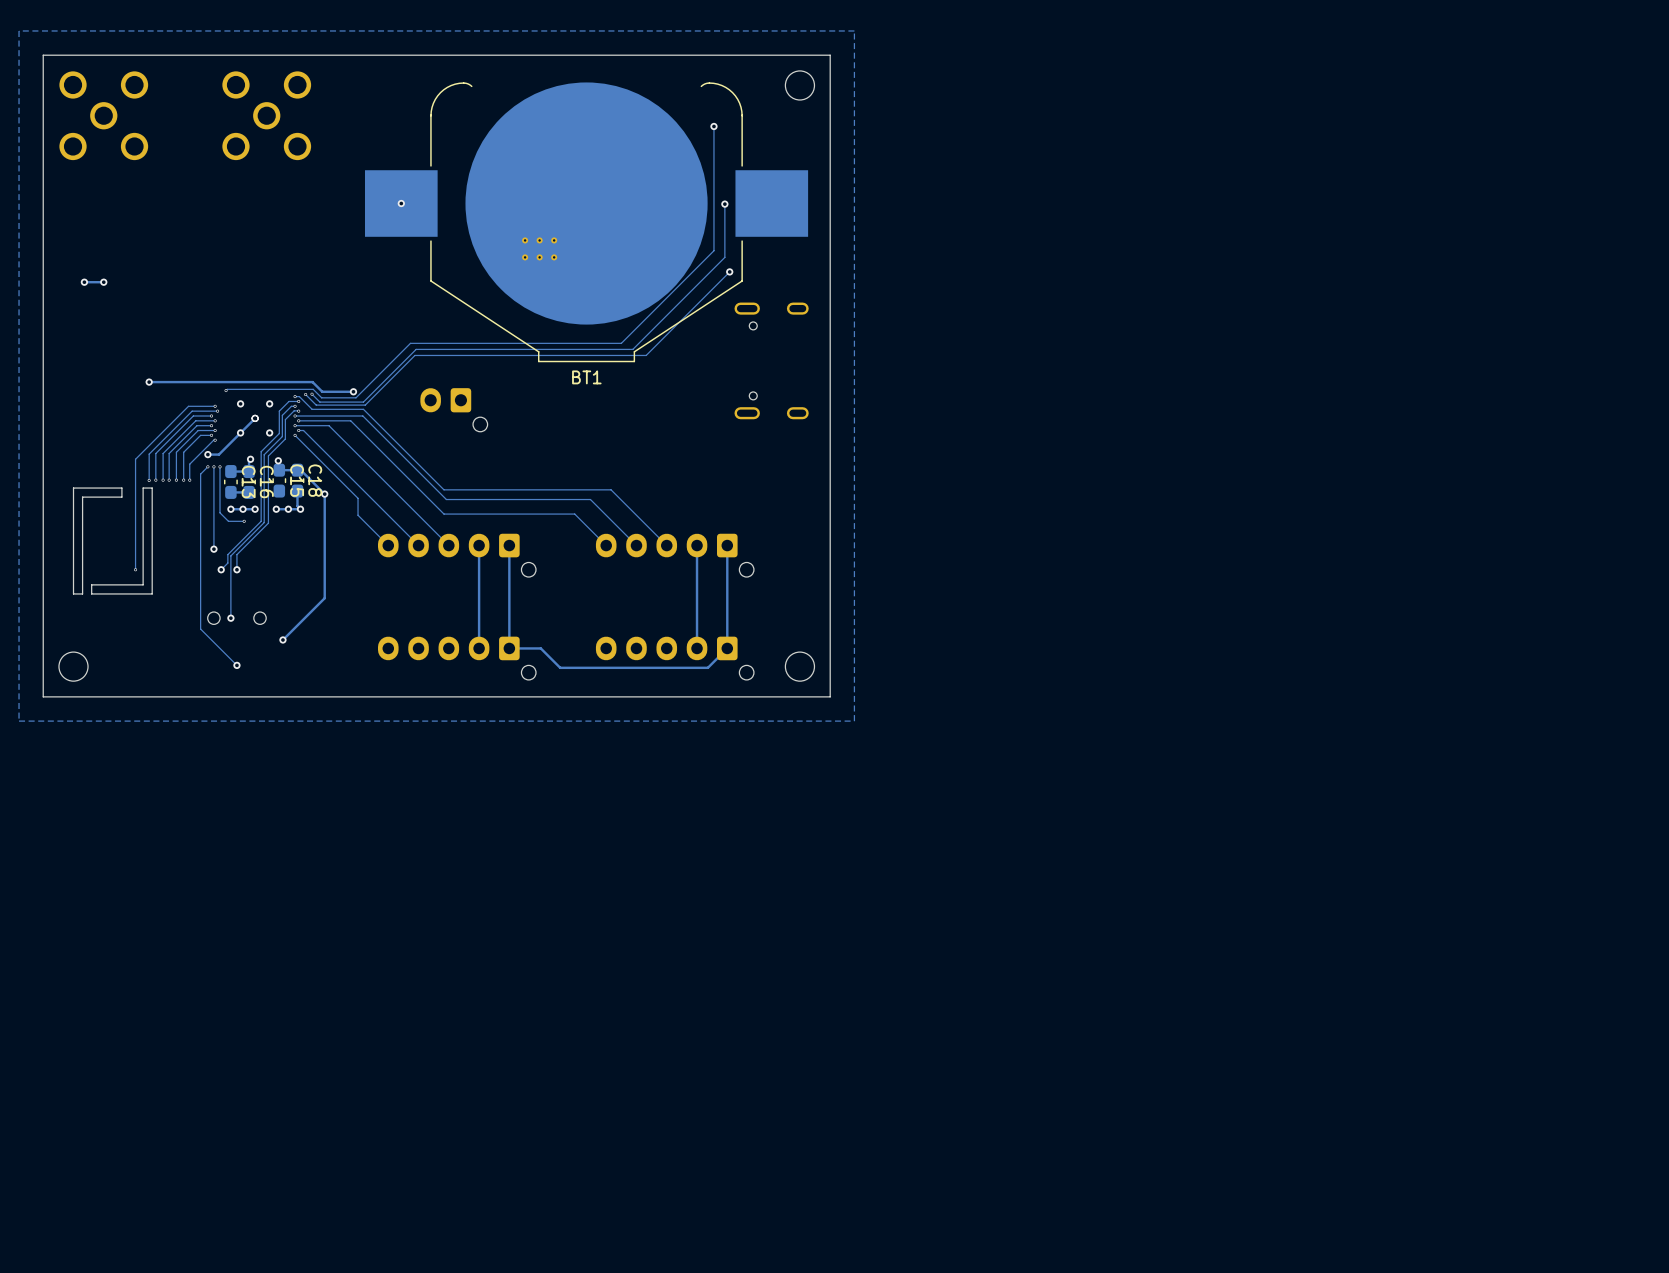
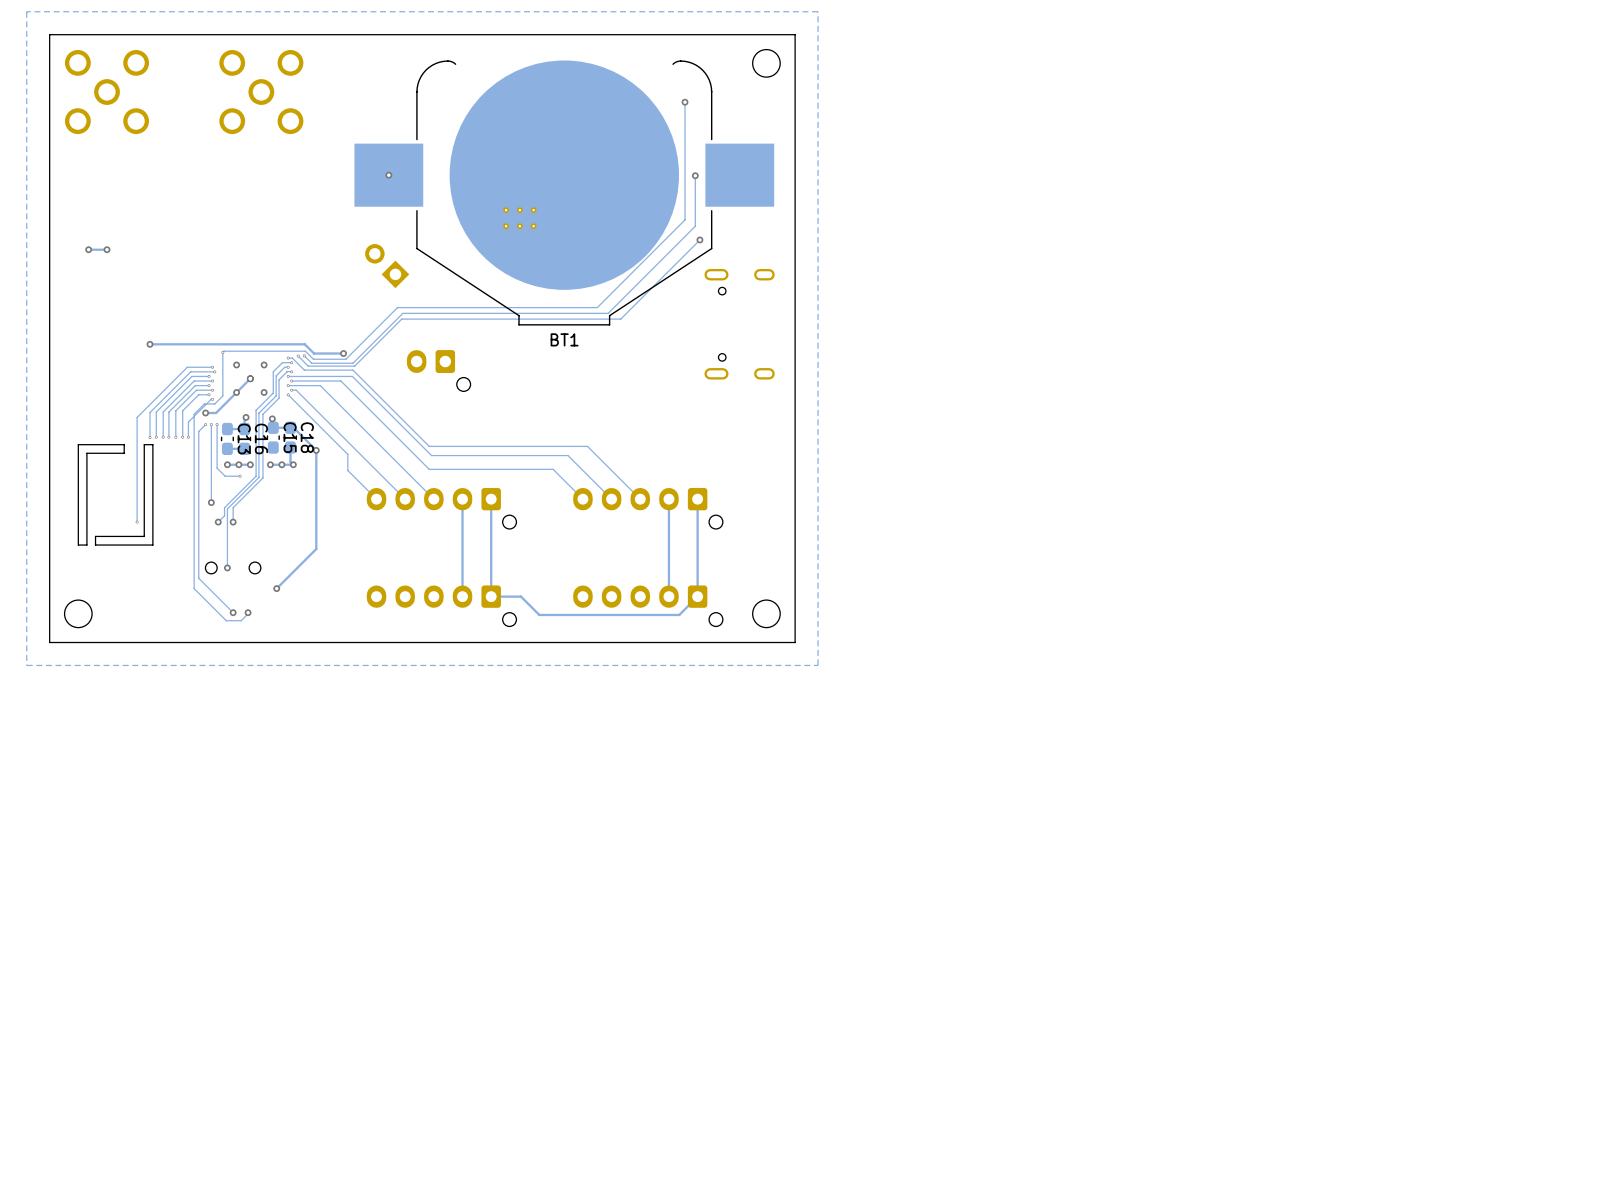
part: none -> (387, 266)
track: none -> (222, 352) (222, 395) (214, 403) (204, 403) (194, 414) (194, 588) (226, 620) (241, 620) (248, 612)
via: none -> (248, 612)

